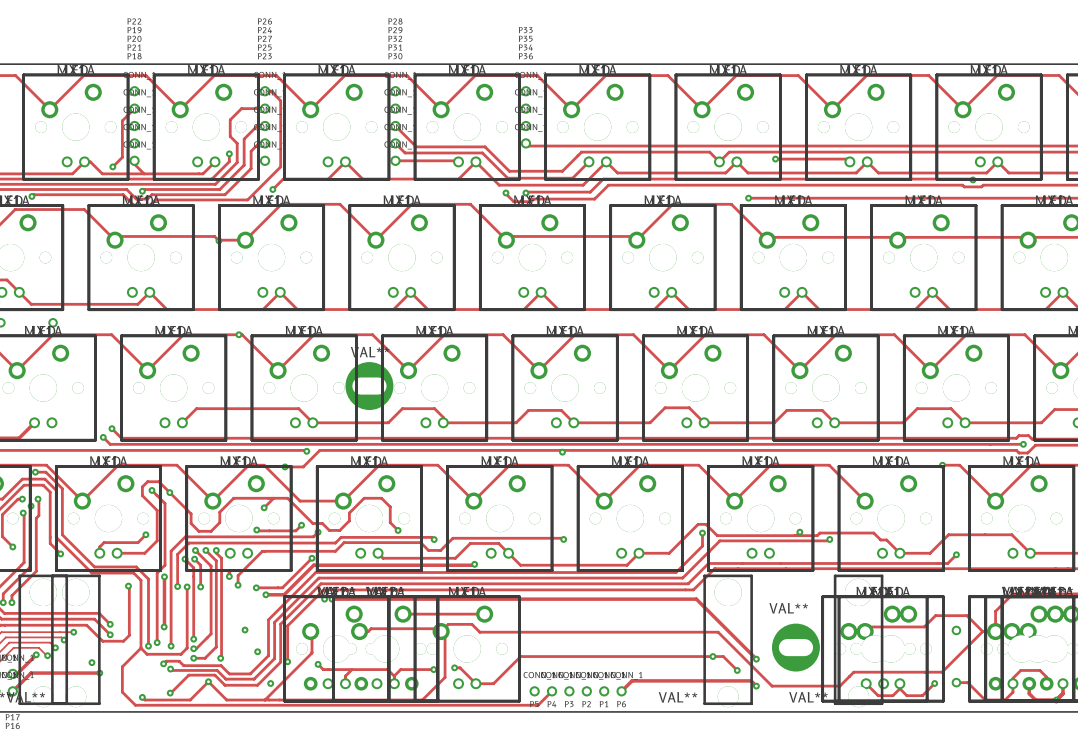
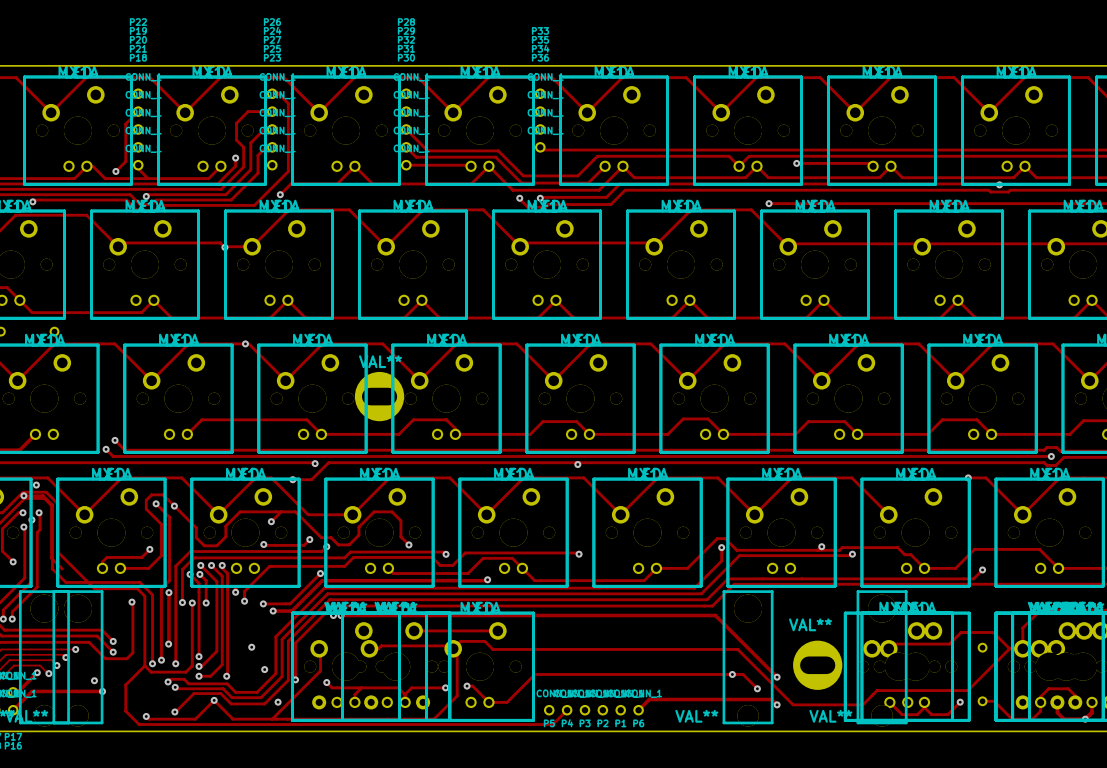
track: (35, 472) (45, 472) (62, 488) (62, 534) (94, 566) -> (23, 495) (43, 495) (52, 505) (52, 569) (65, 582) (97, 582)
via: none -> (23, 495)
via: (60, 553) -> none

